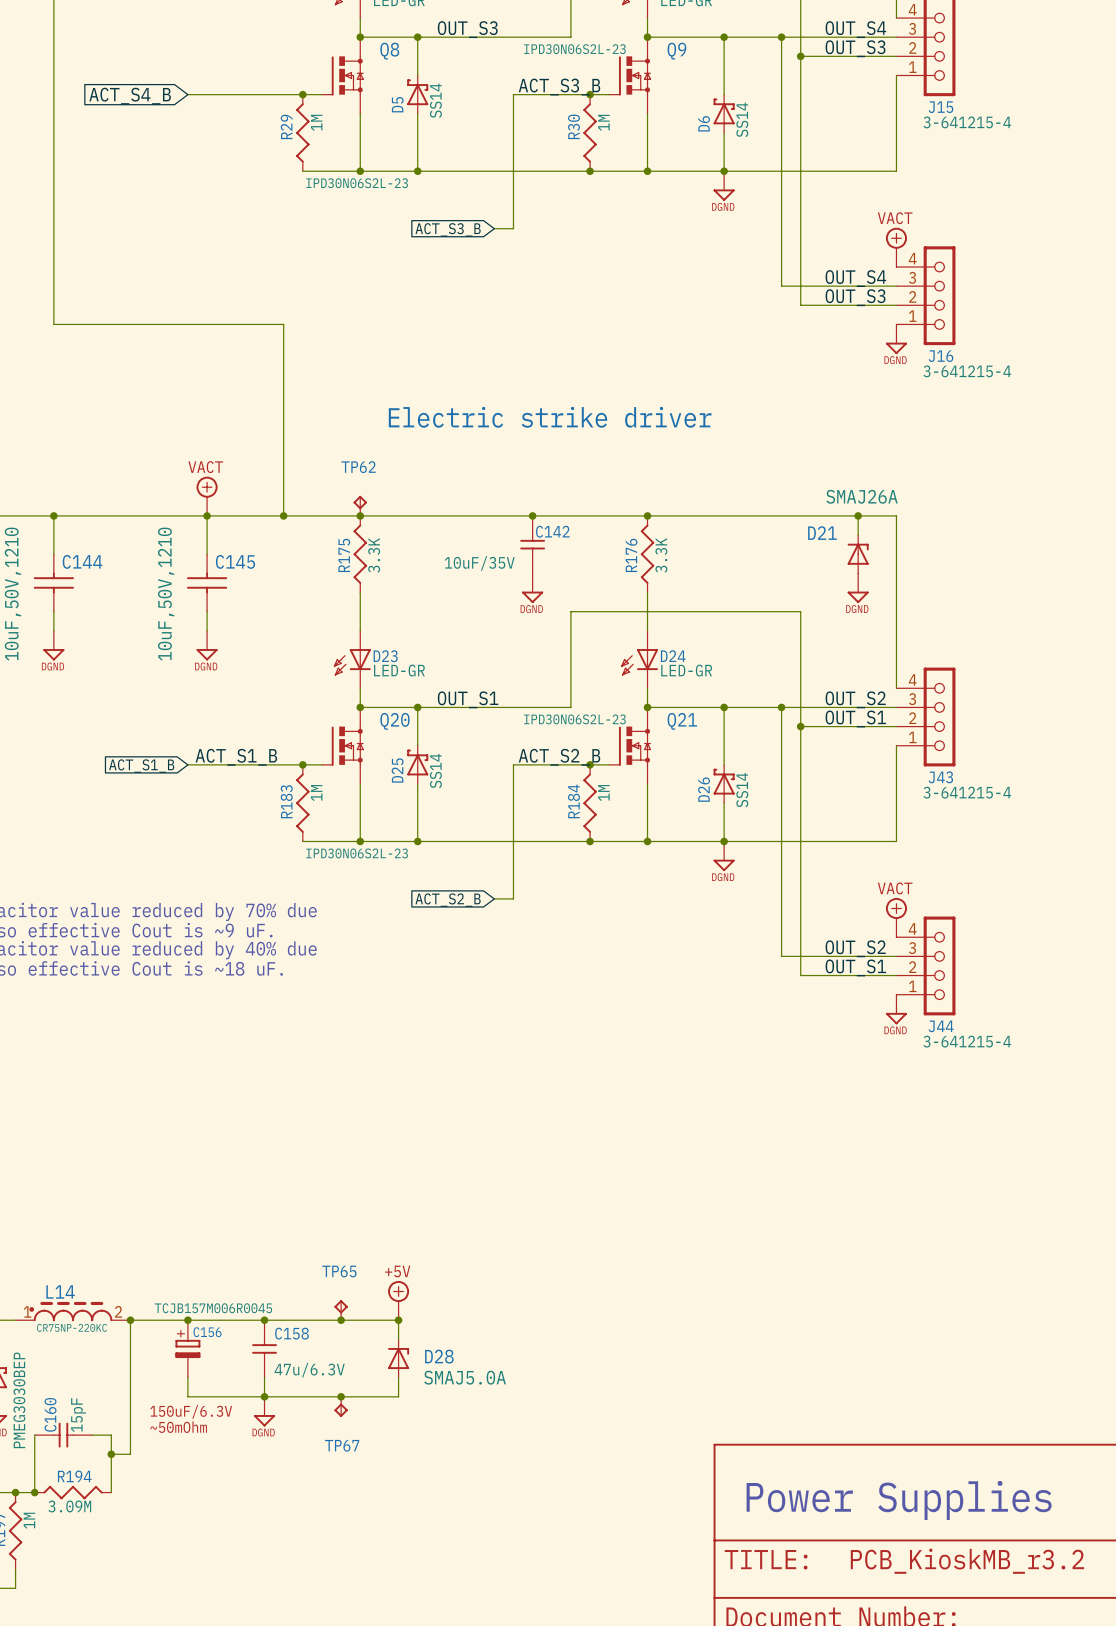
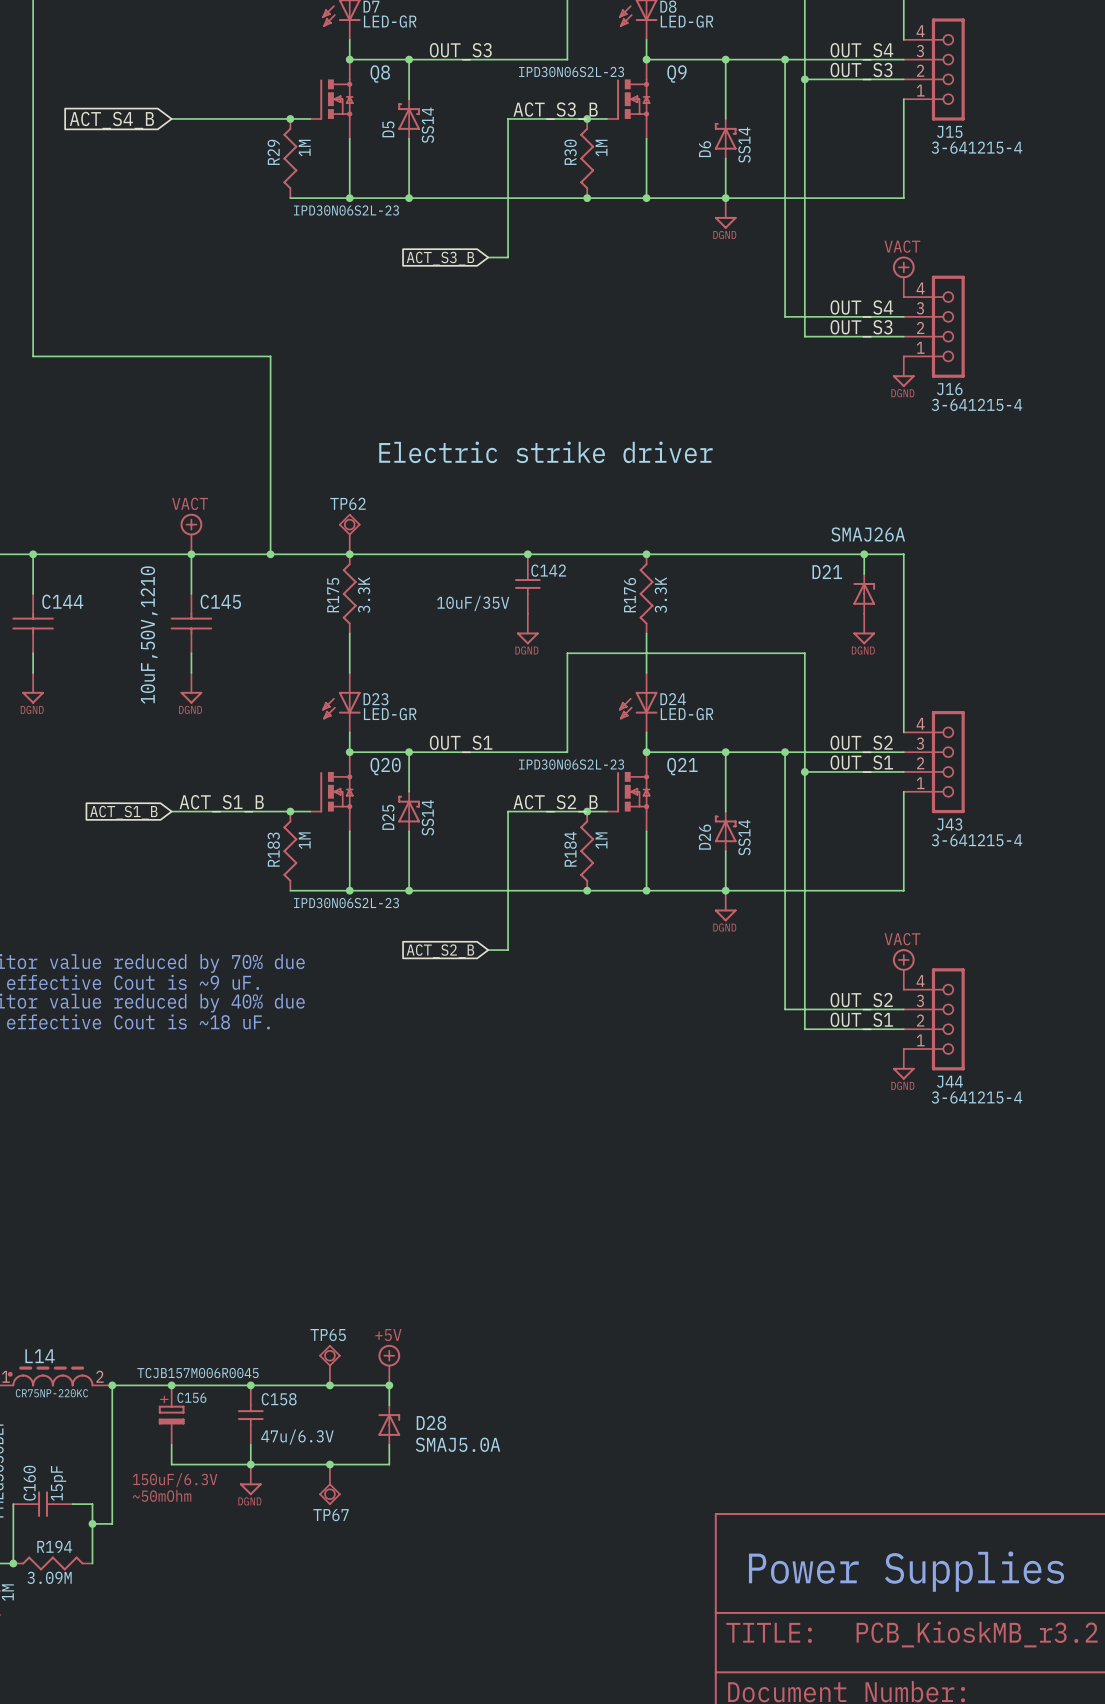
TP62 symbol: [353, 495, 367, 516] -> [339, 514, 361, 555]
TP65 symbol: [334, 1300, 348, 1321] -> [319, 1345, 341, 1386]
TP67 symbol: [334, 1396, 348, 1417] -> [319, 1464, 341, 1505]

